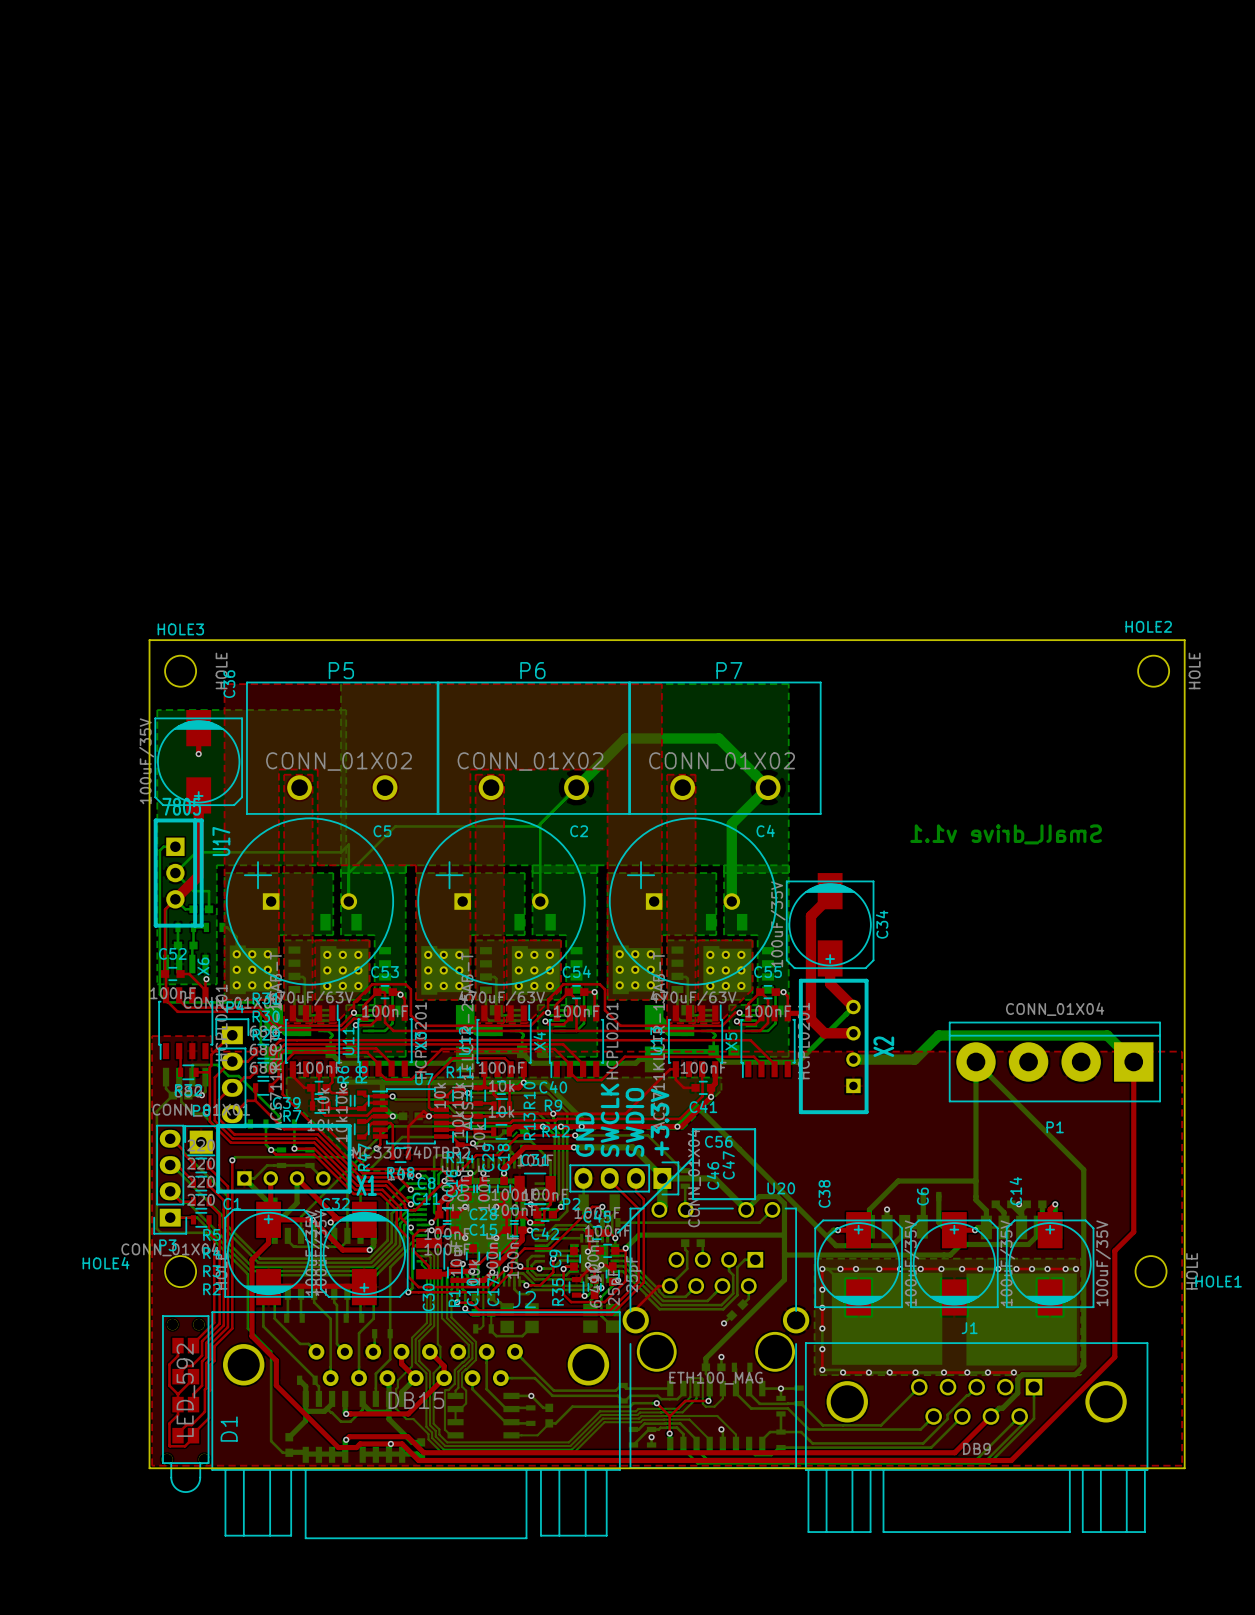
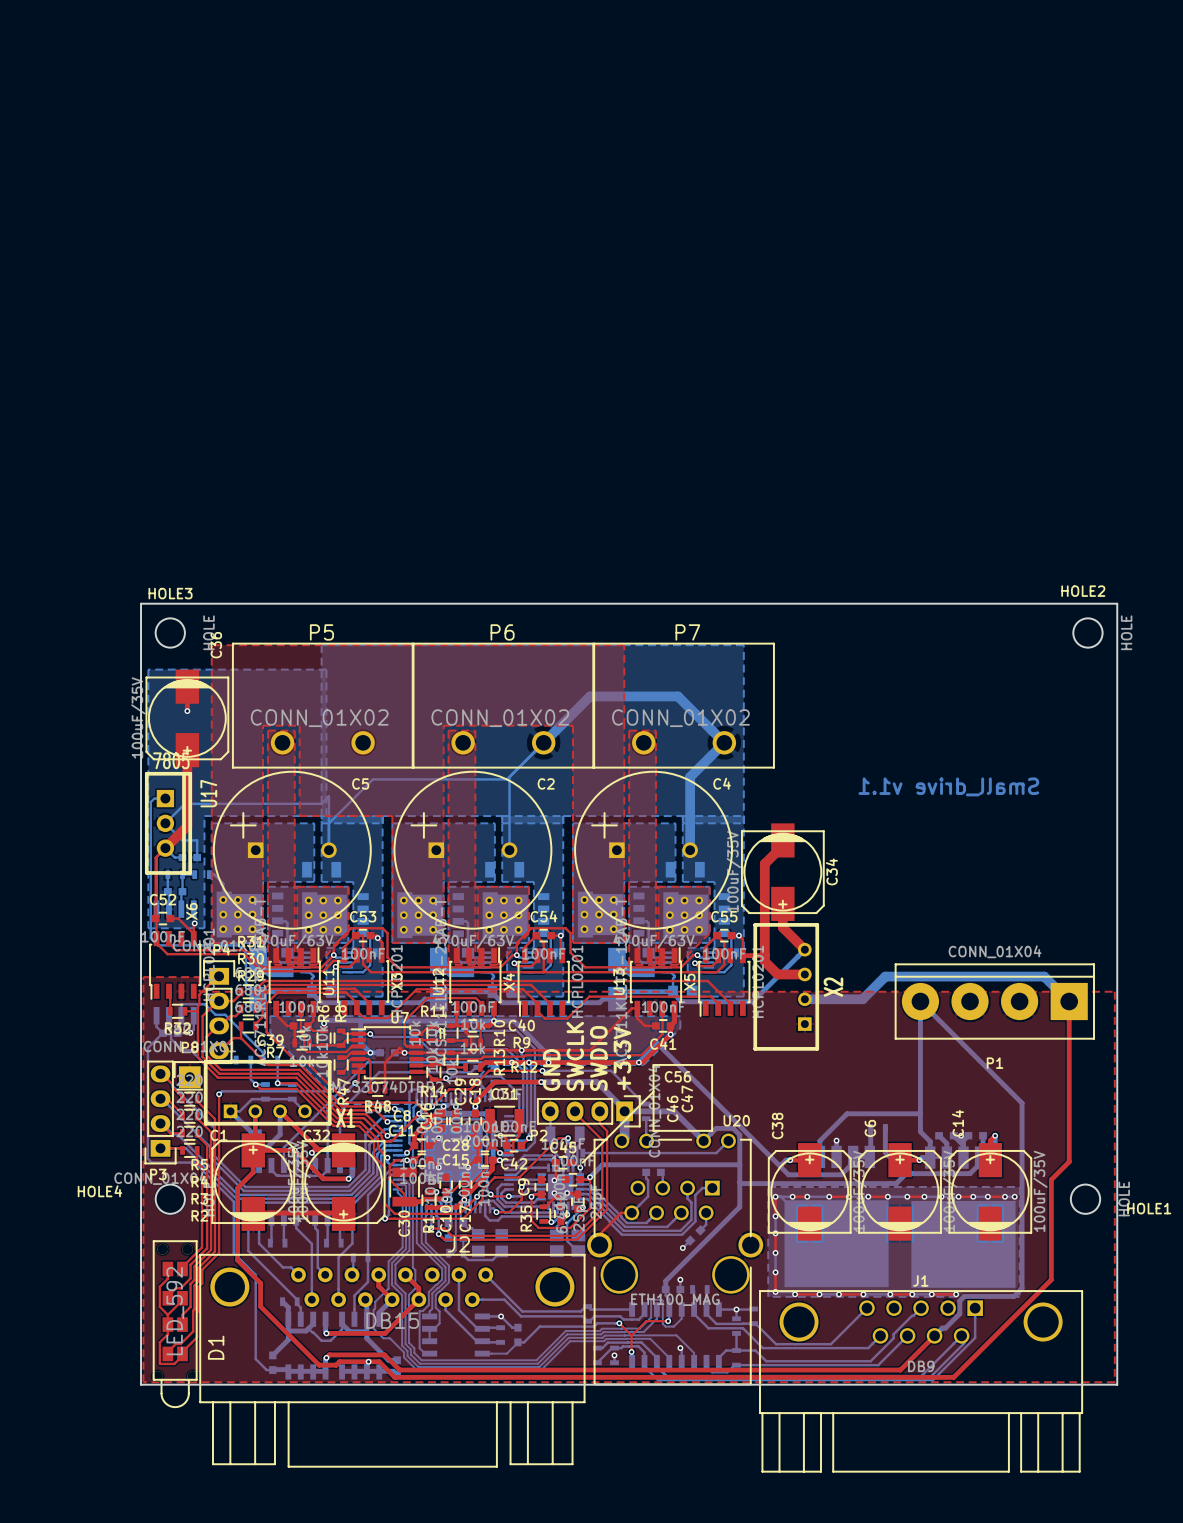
J2 name position: J2 (524, 1299) -> J2 (458, 1244)
J2 footprint: [211, 1311, 621, 1540] -> [199, 1254, 586, 1468]
J1 footprint: [805, 1342, 1149, 1533] -> [759, 1290, 1083, 1473]

